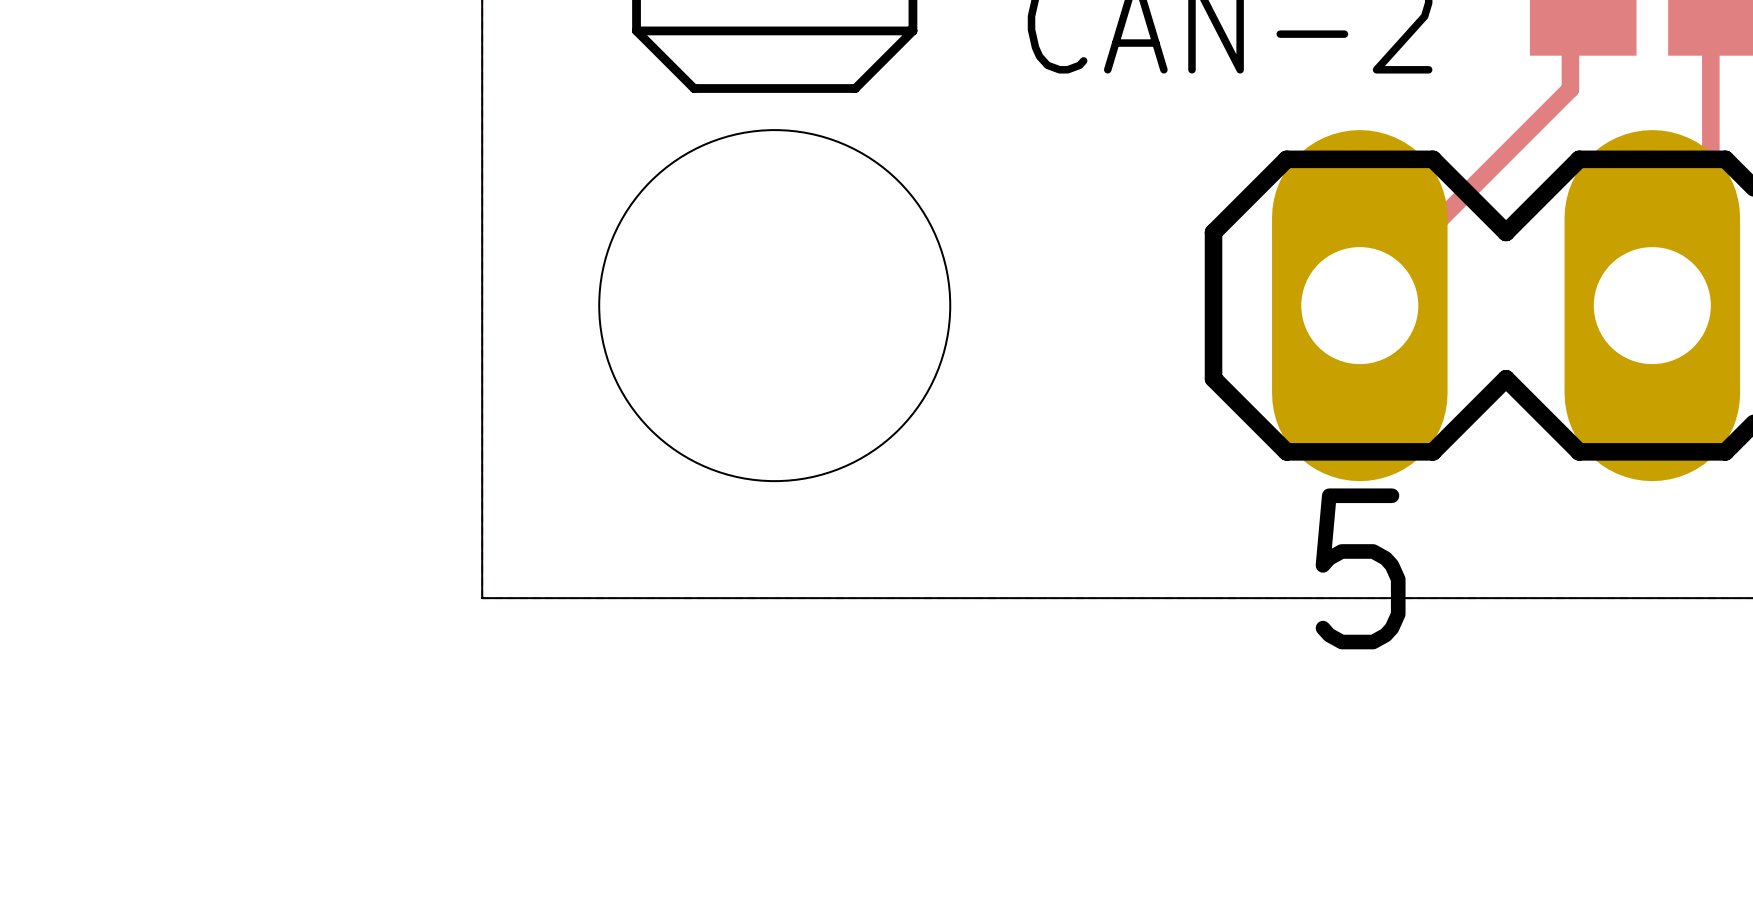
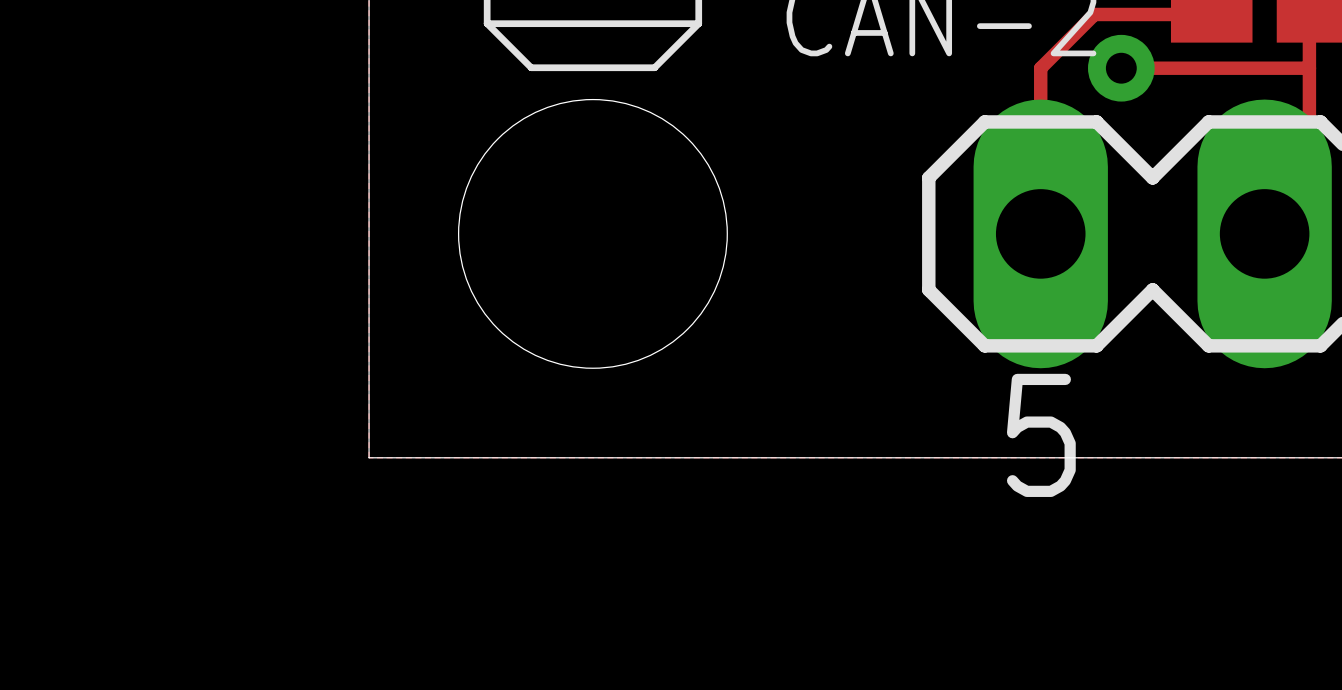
track: (1570, 18) (1570, 89) (1359, 299) -> (1201, 14) (1094, 14) (1040, 68) (1040, 229)
track: none -> (1121, 68) (1309, 68)
via: none -> (1121, 68)

